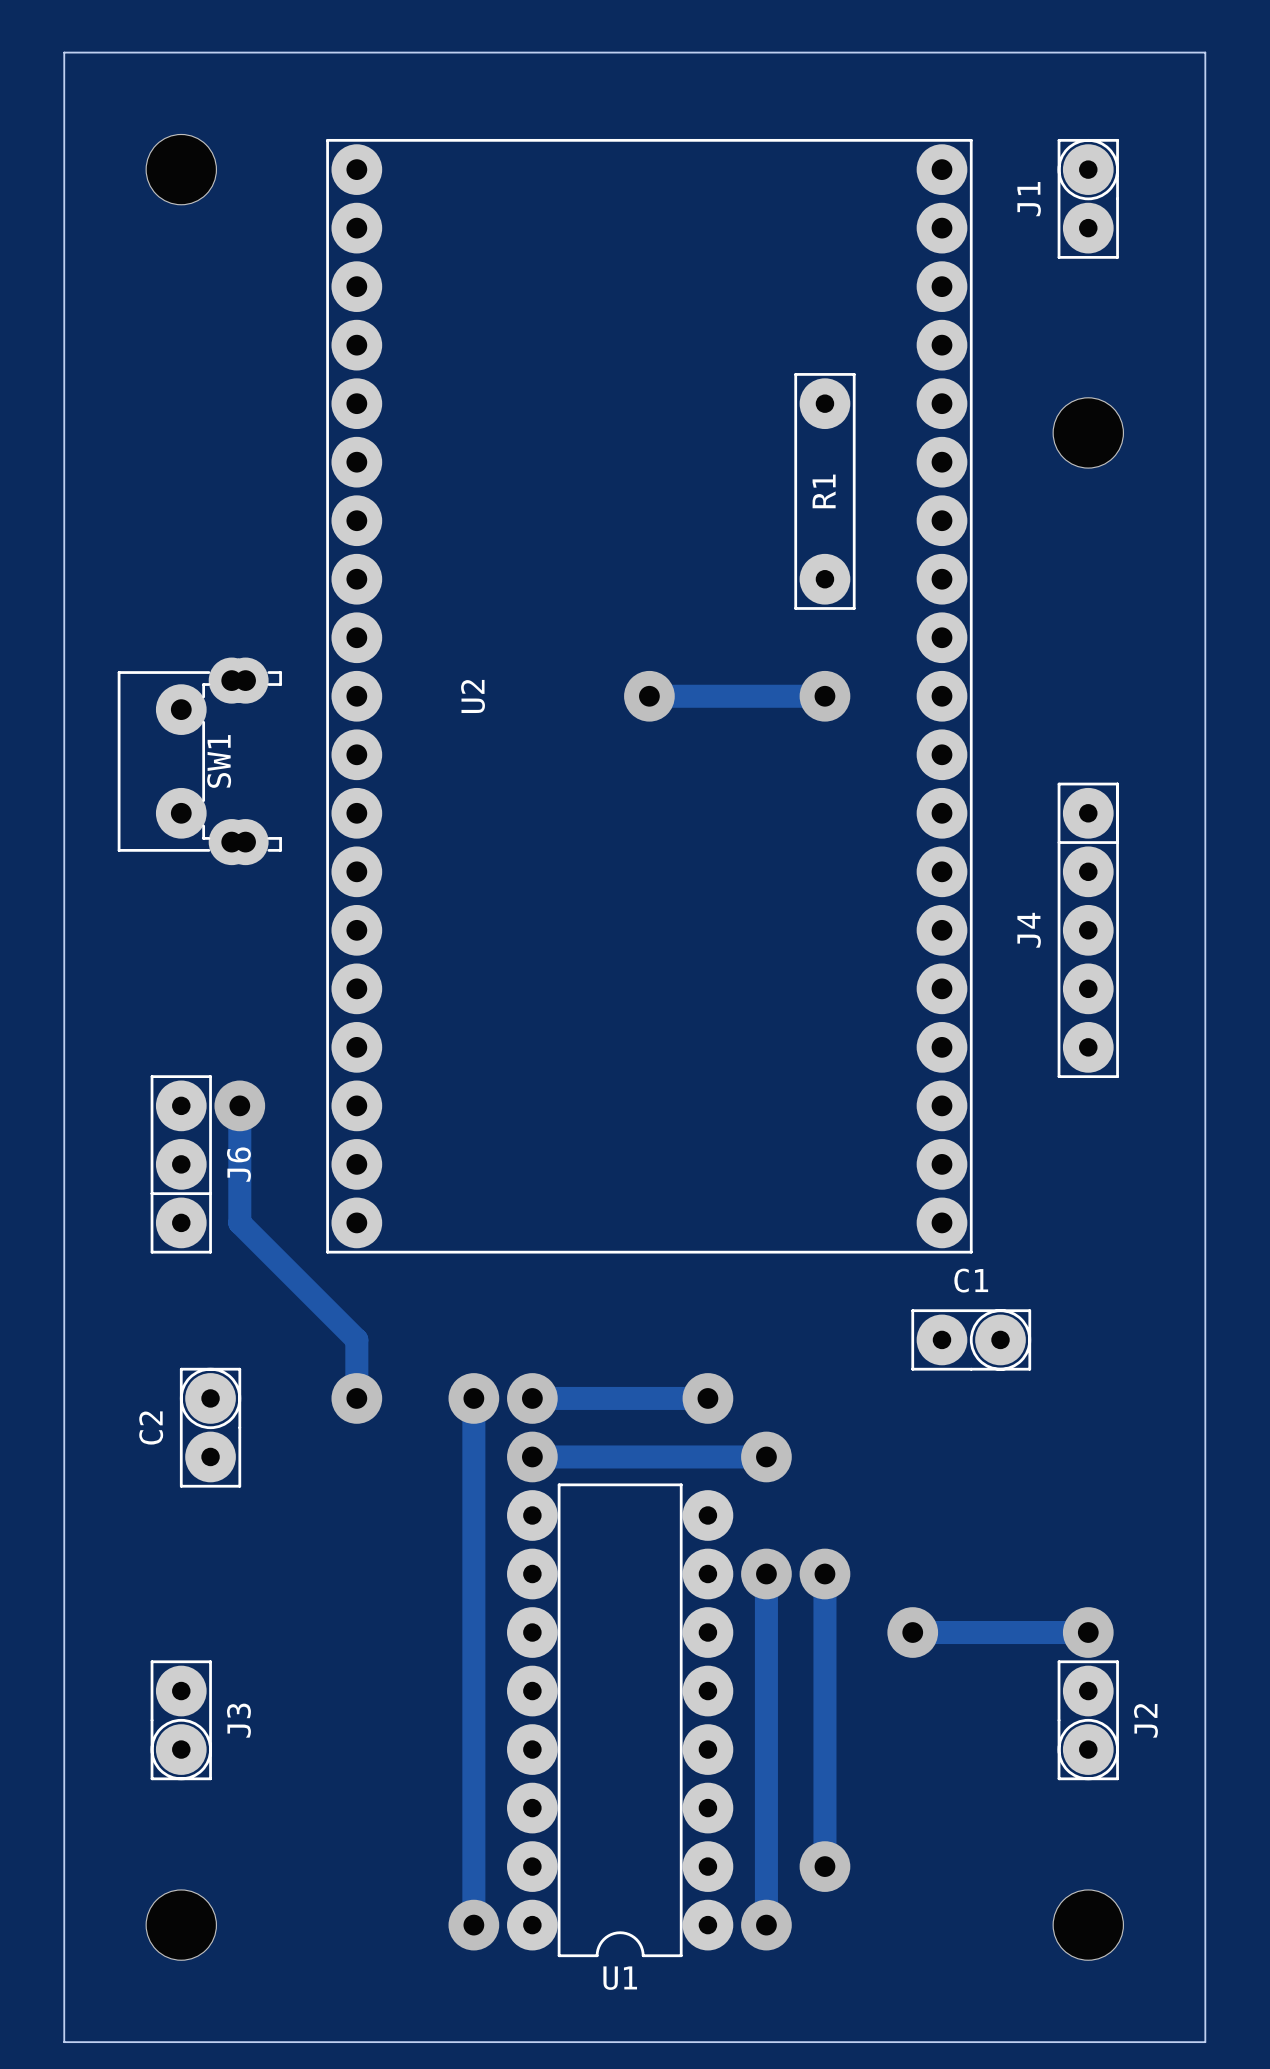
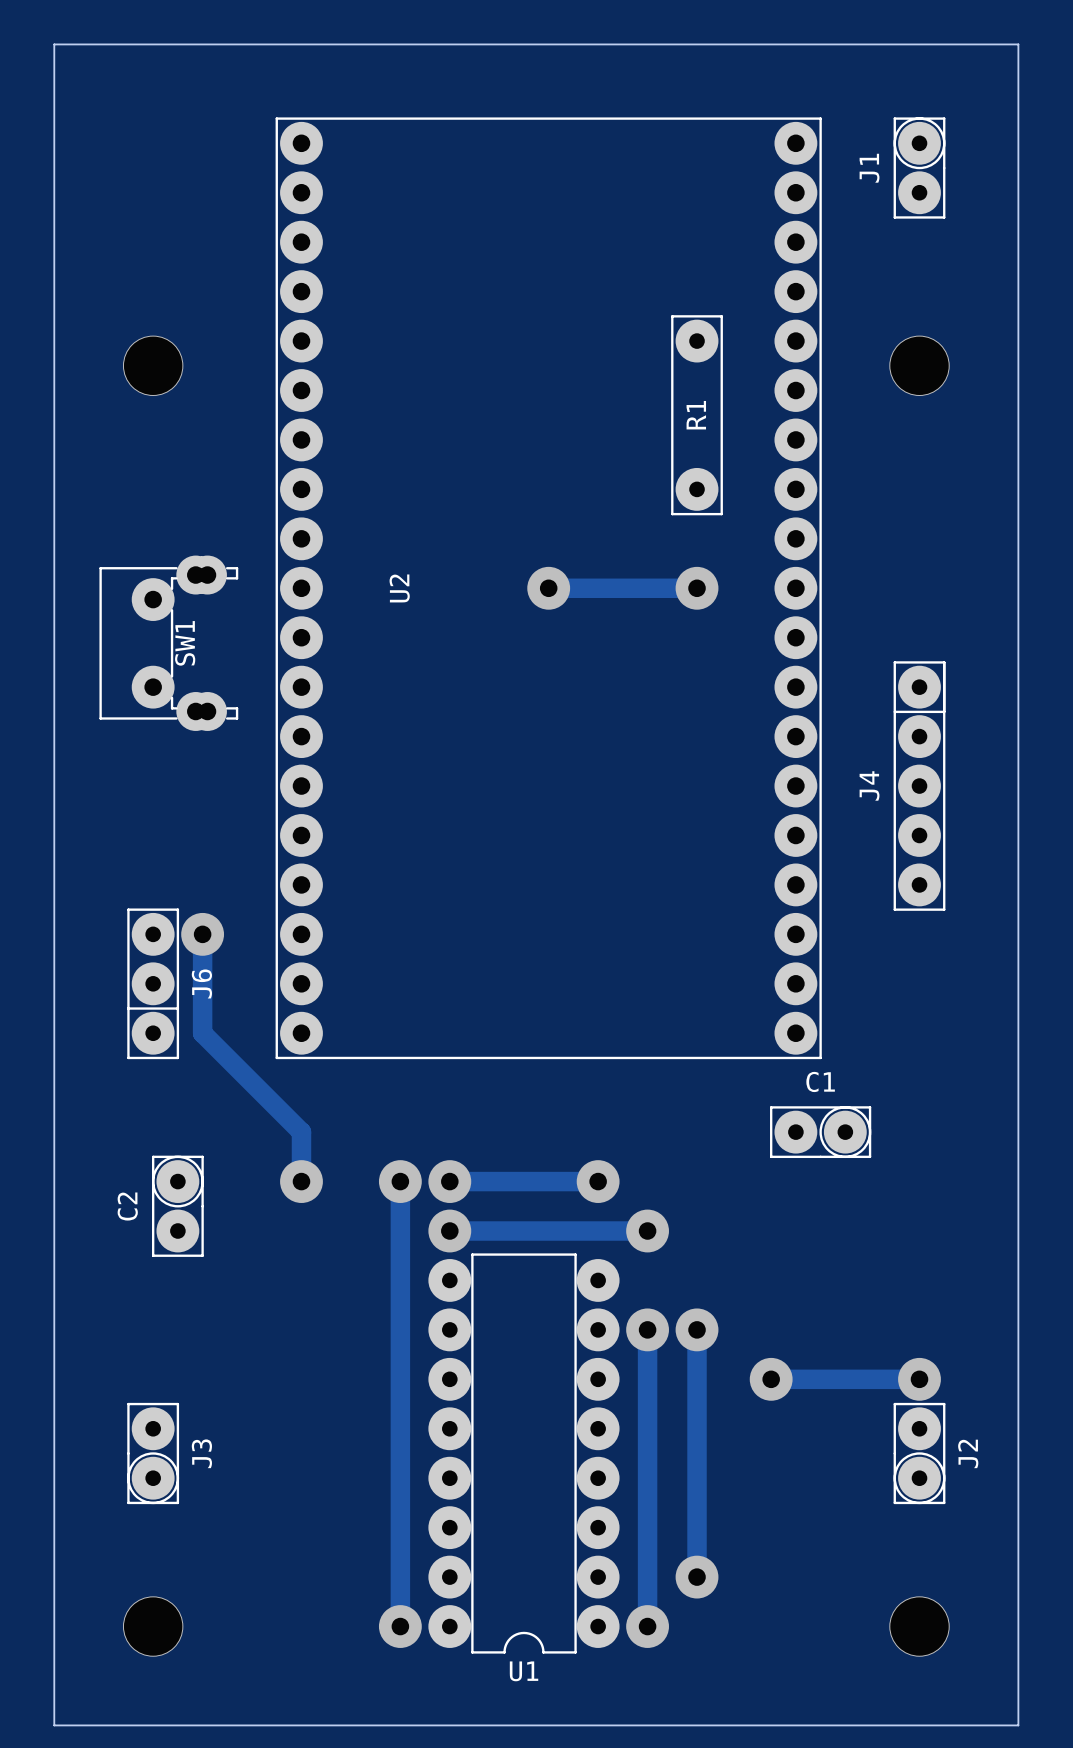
via: (181, 169) -> none
via: none -> (153, 365)

